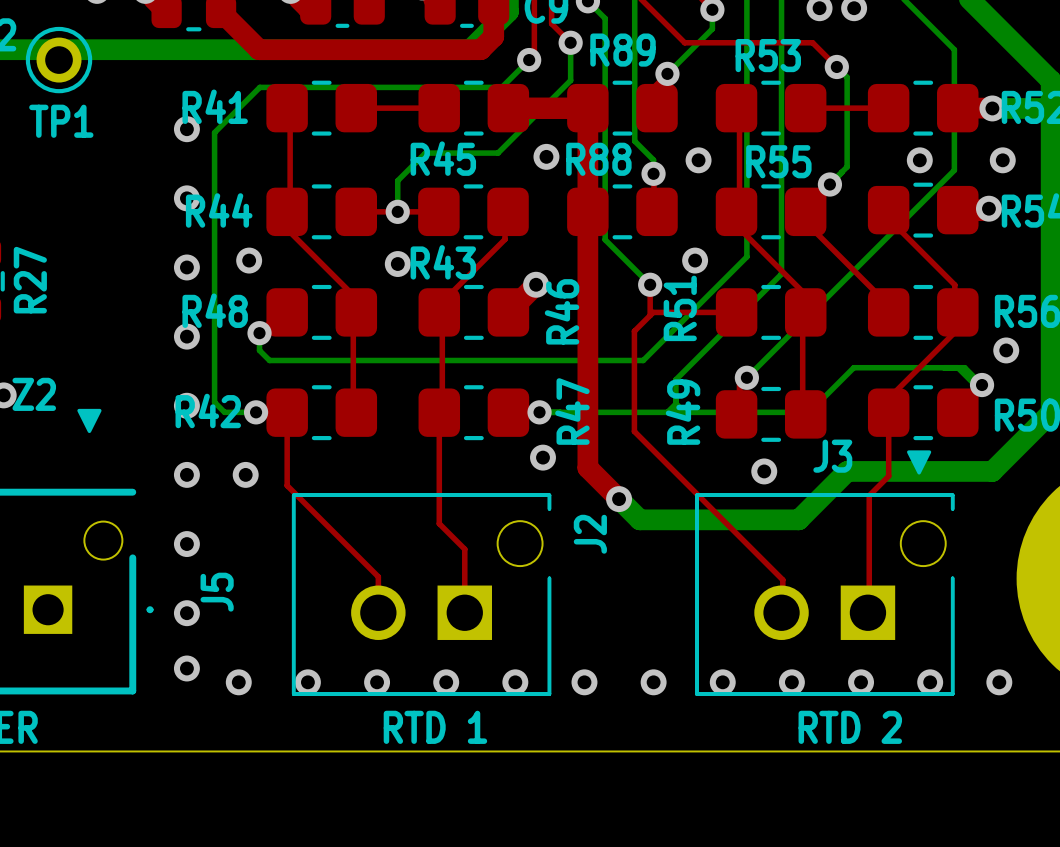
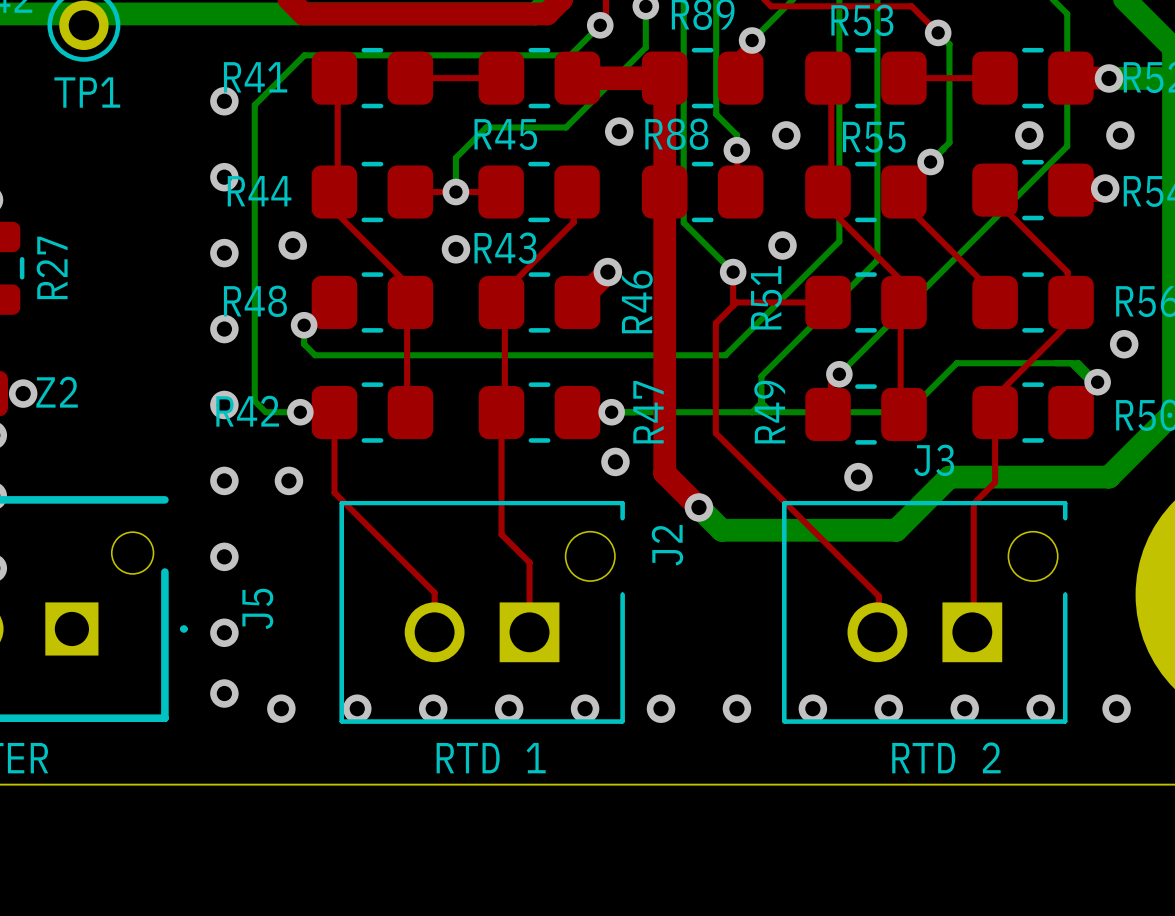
drawing: [77, 408, 102, 434] -> none
drawing: [907, 450, 932, 475] -> none

